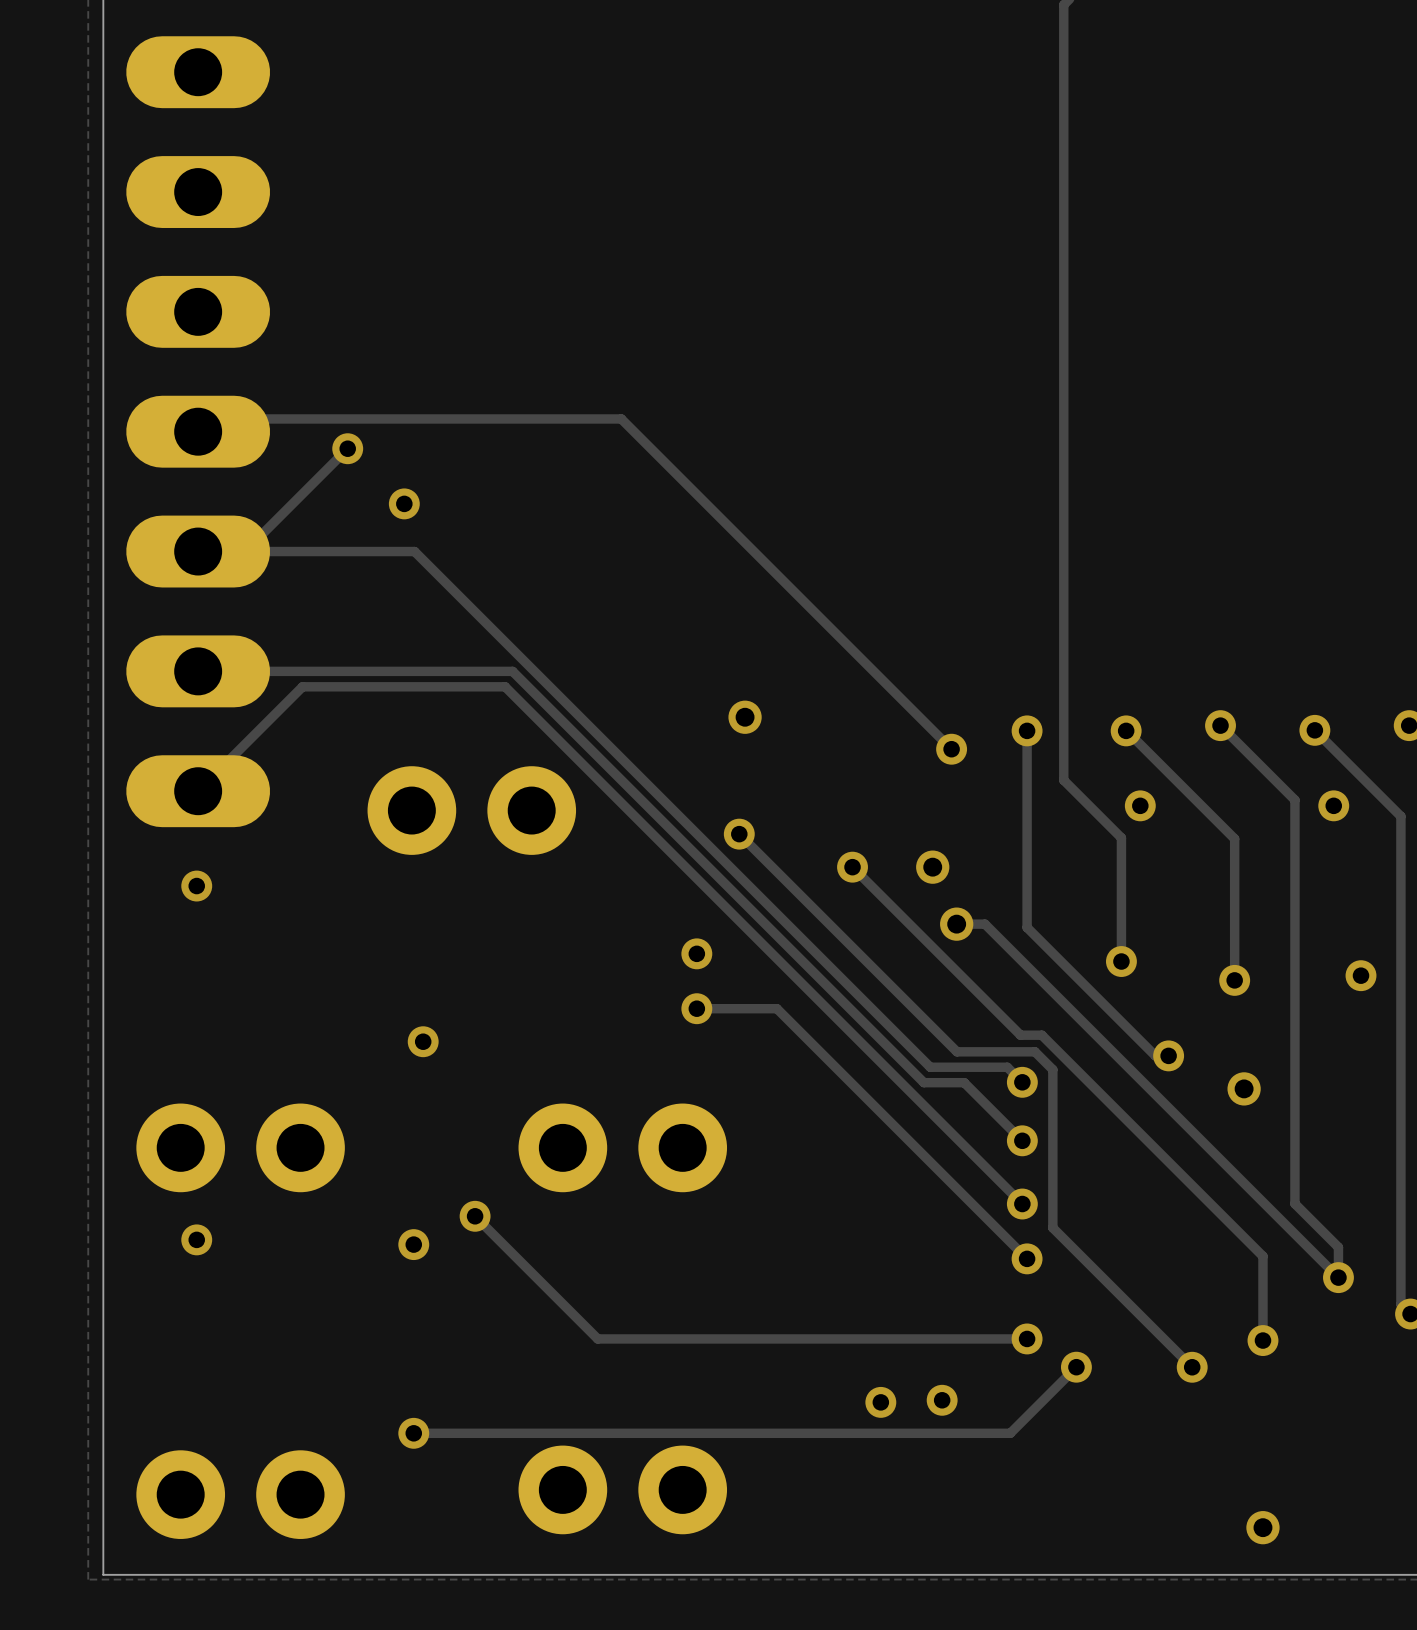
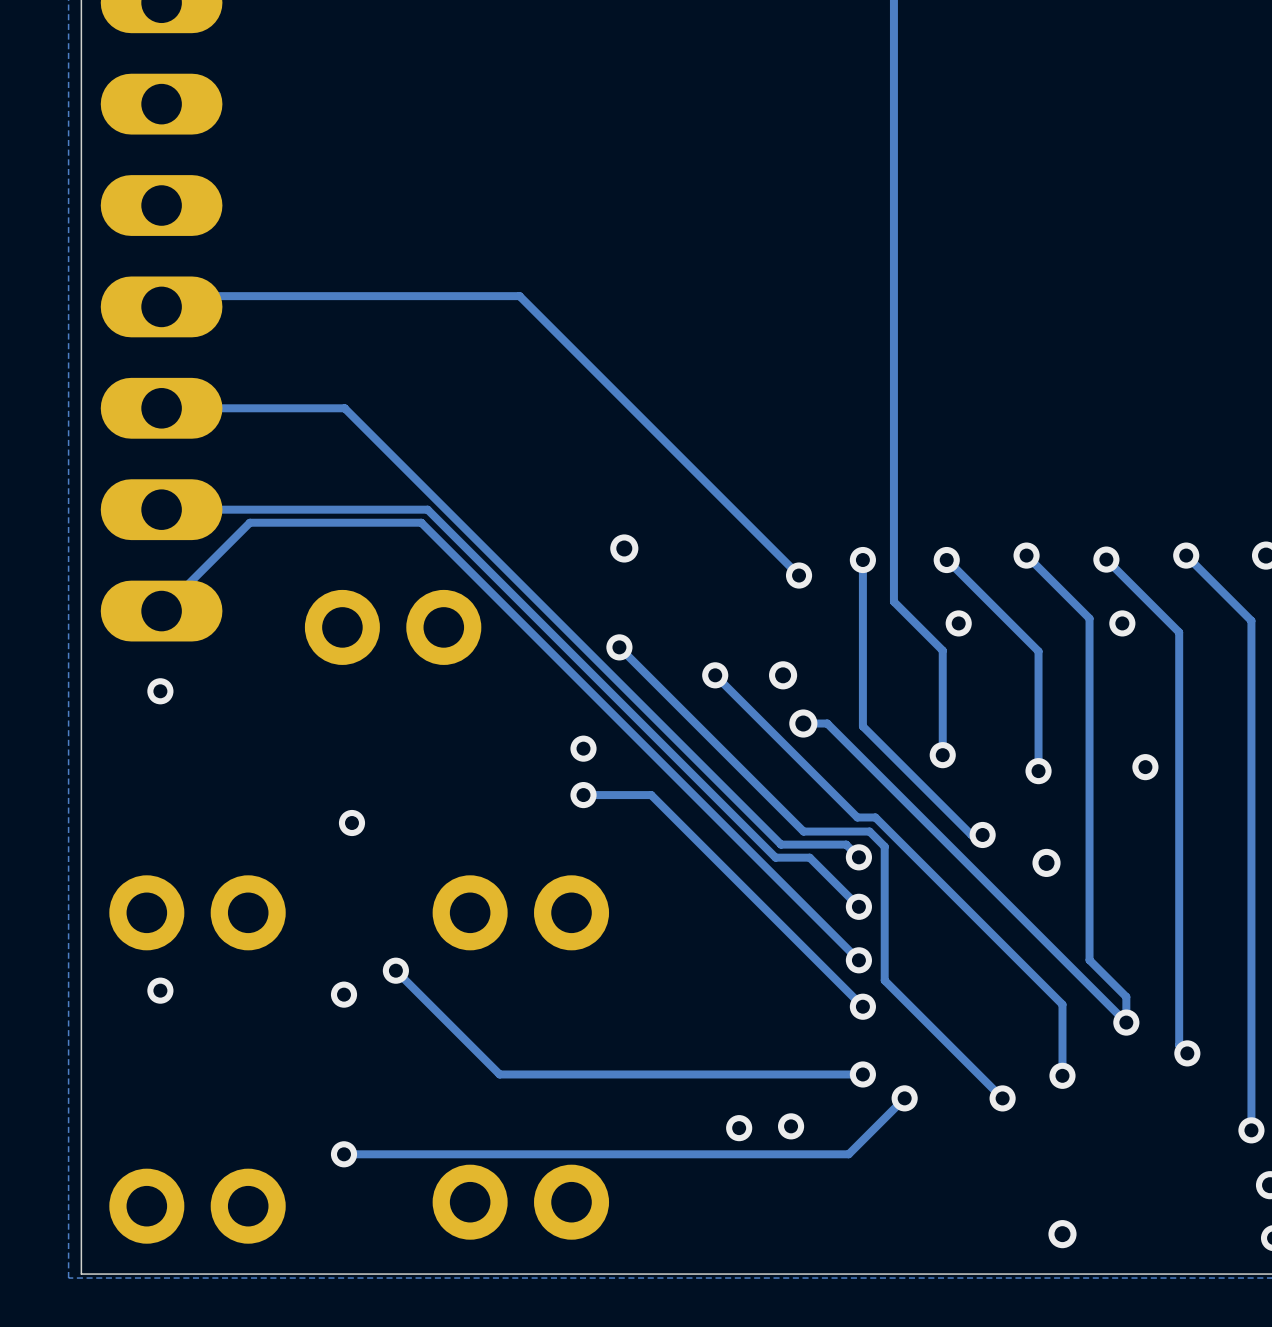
track: (347, 448) (244, 551) -> none
via: (347, 448) -> none
via: (404, 503) -> none

